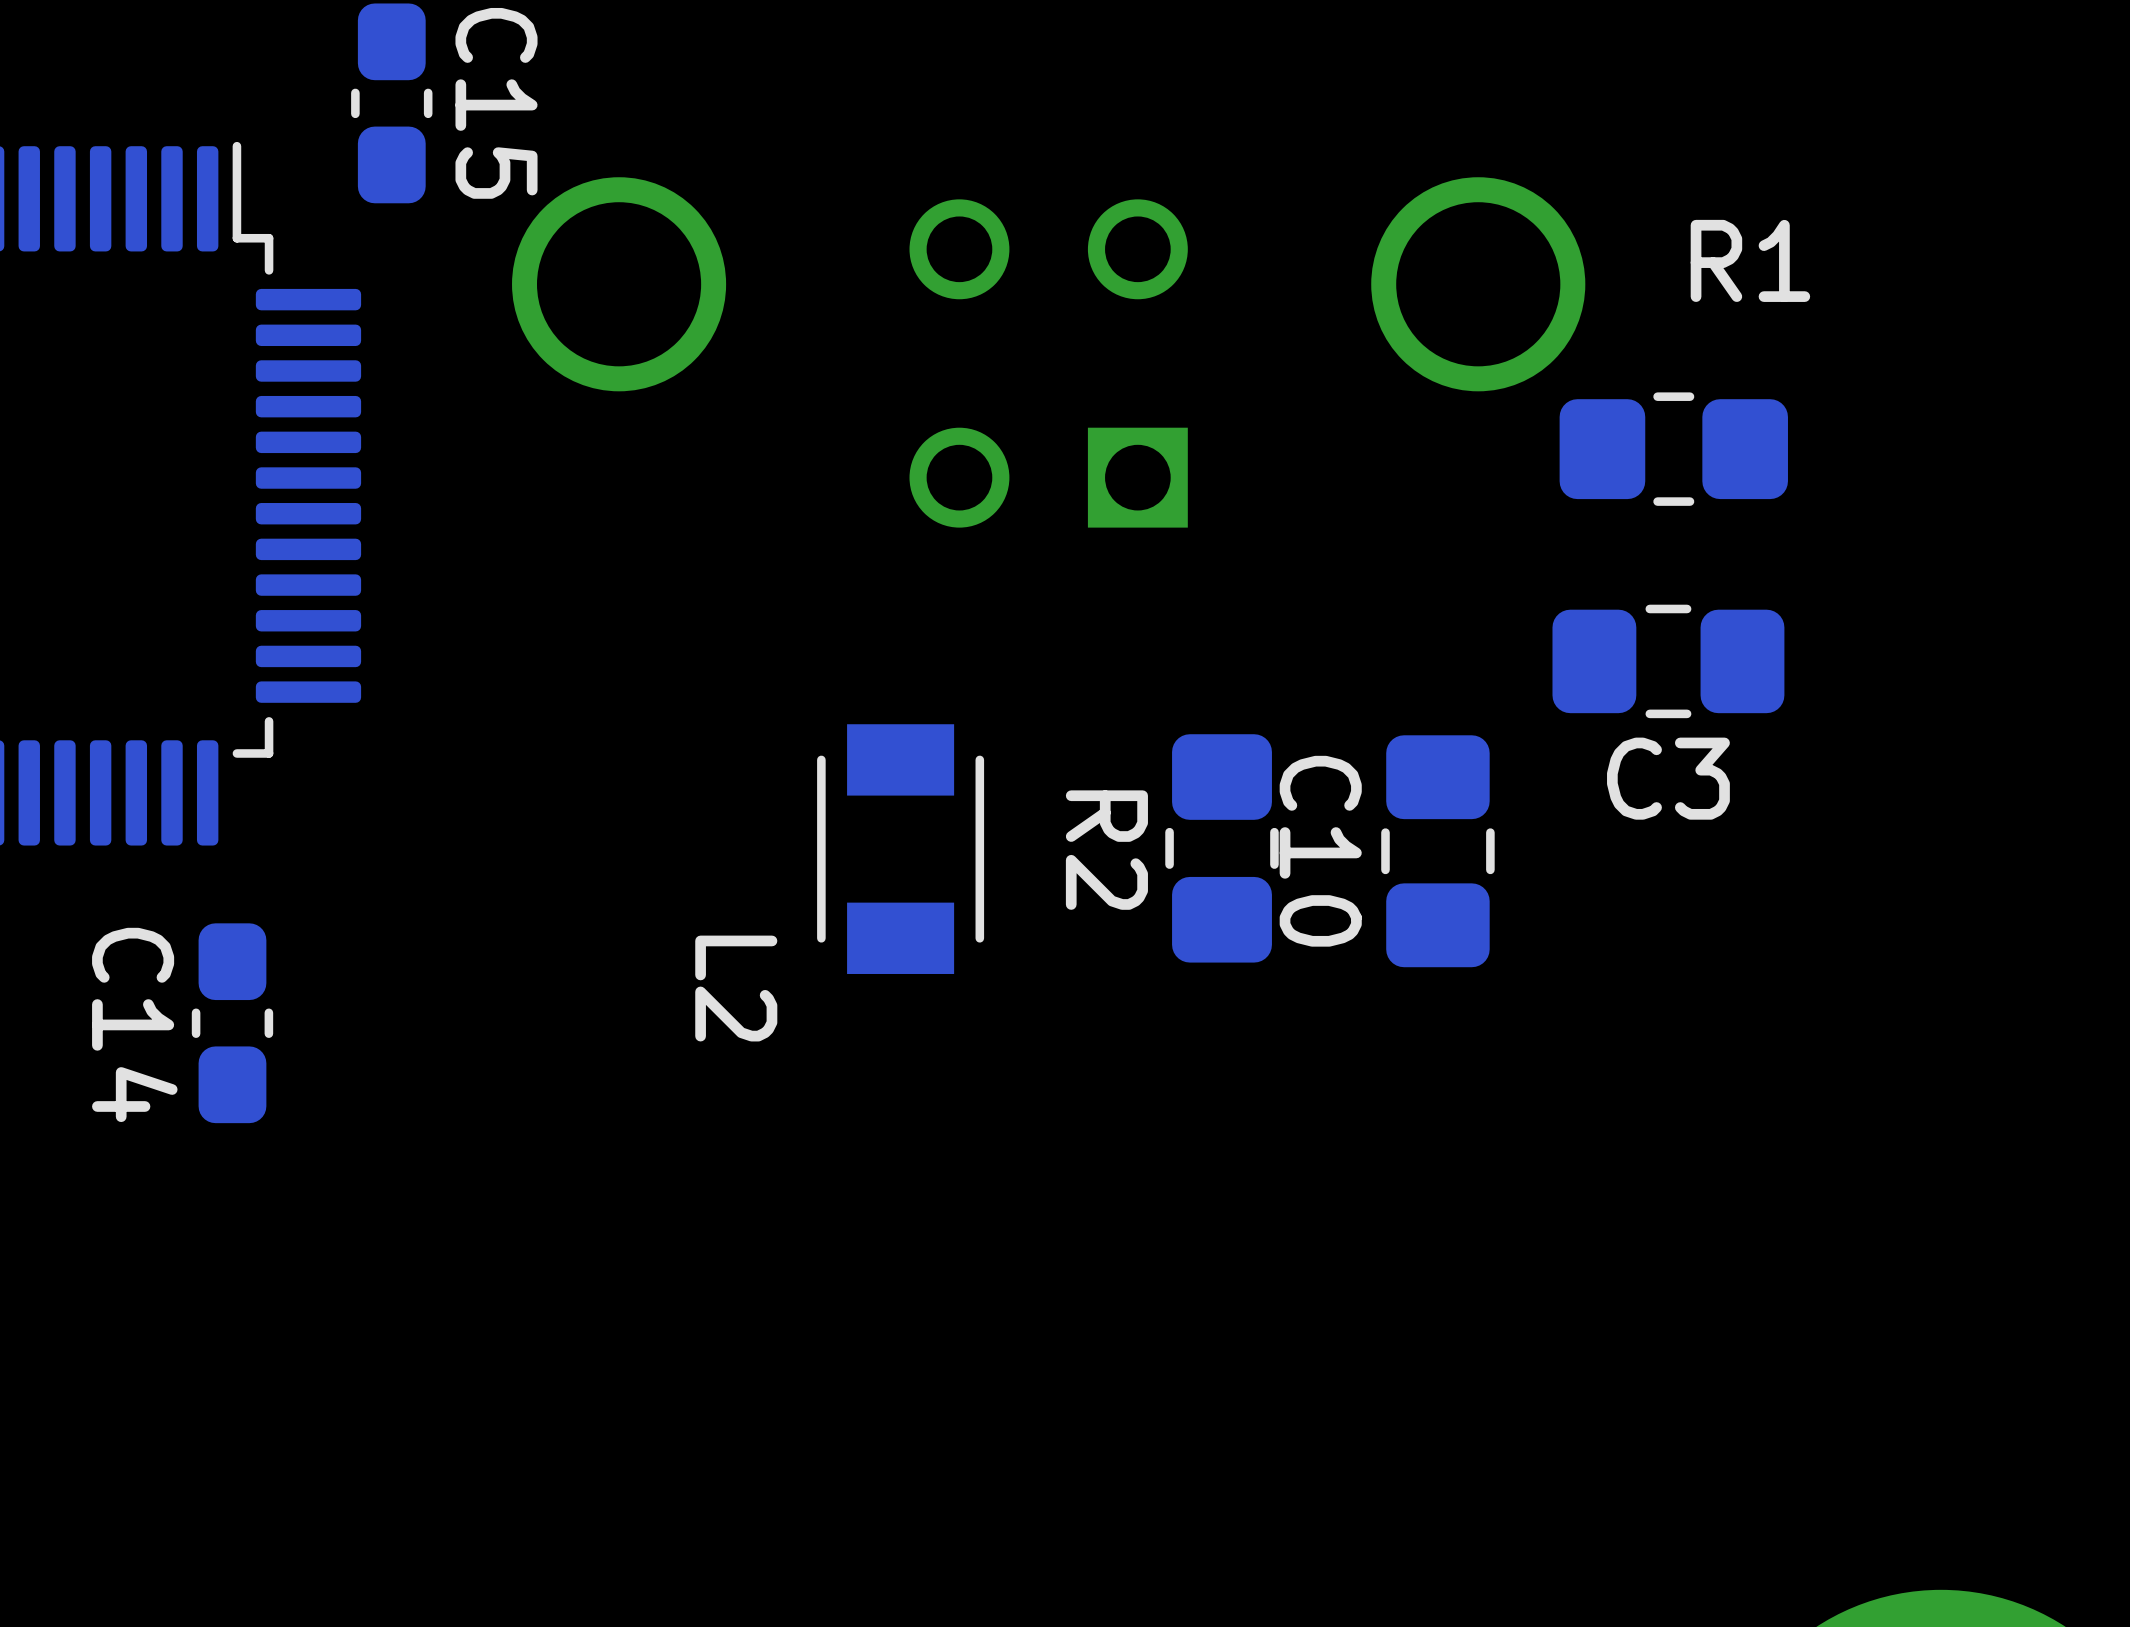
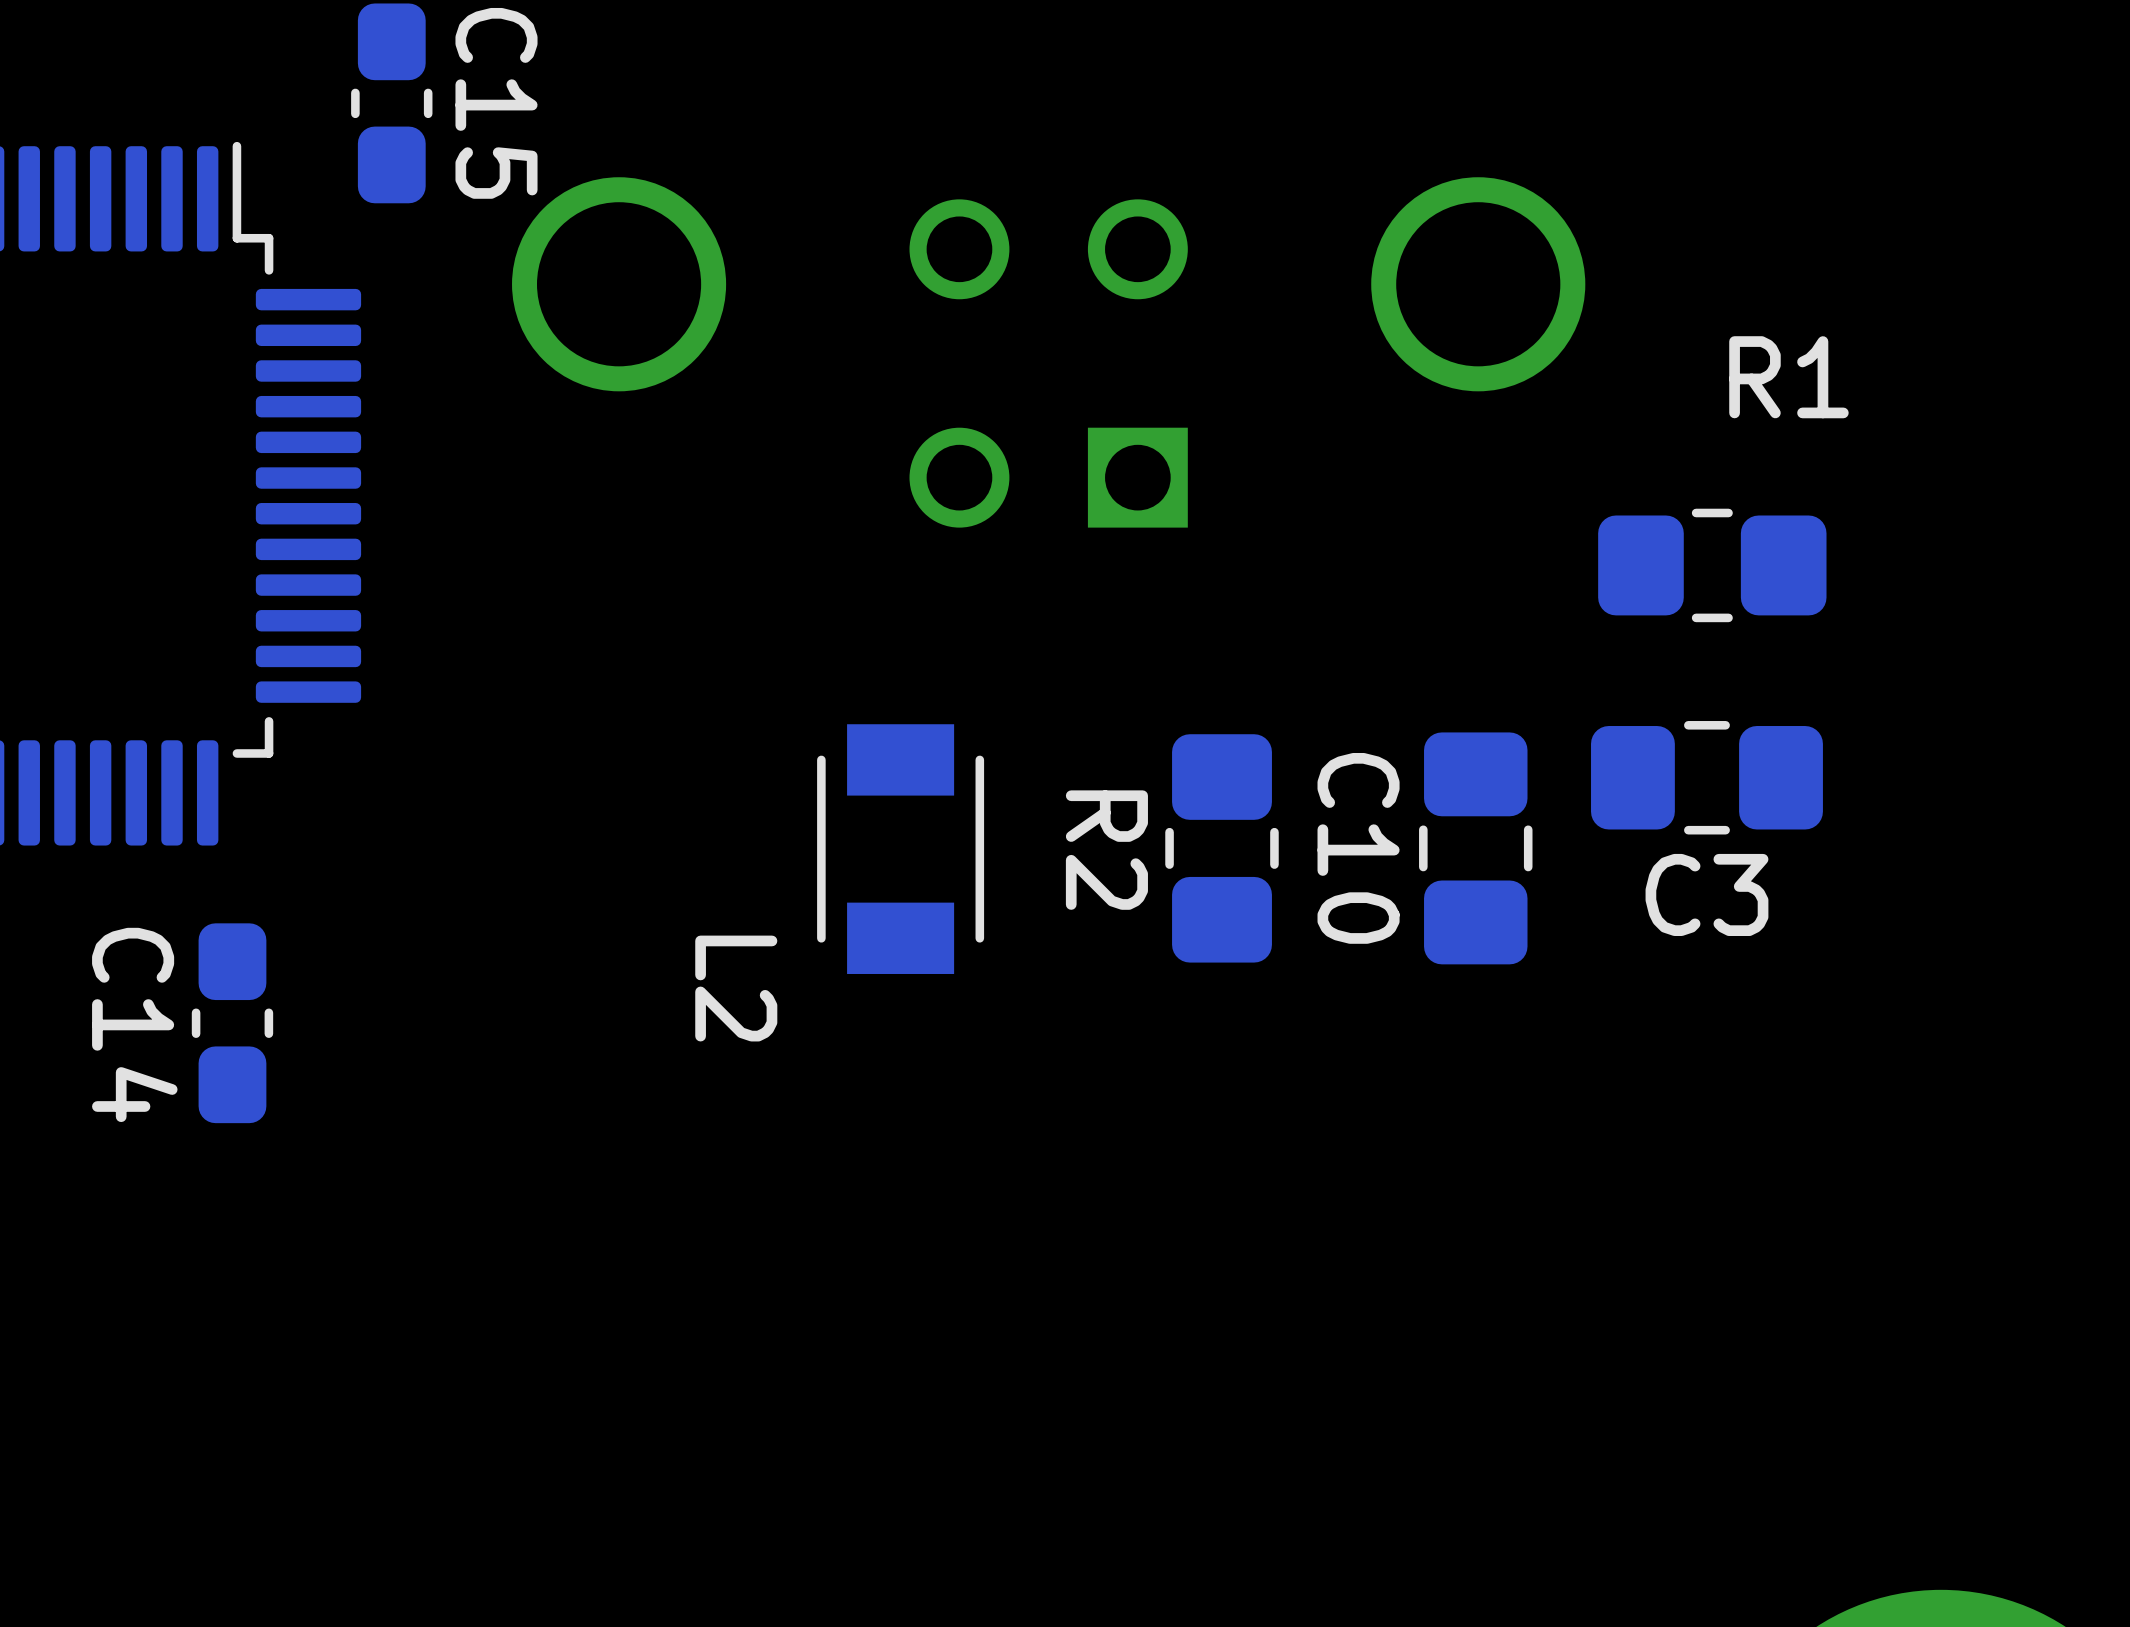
R1 position: (1673, 449) -> (1712, 565)
C3 position: (1668, 661) -> (1706, 777)
C10 position: (1437, 851) -> (1475, 848)

